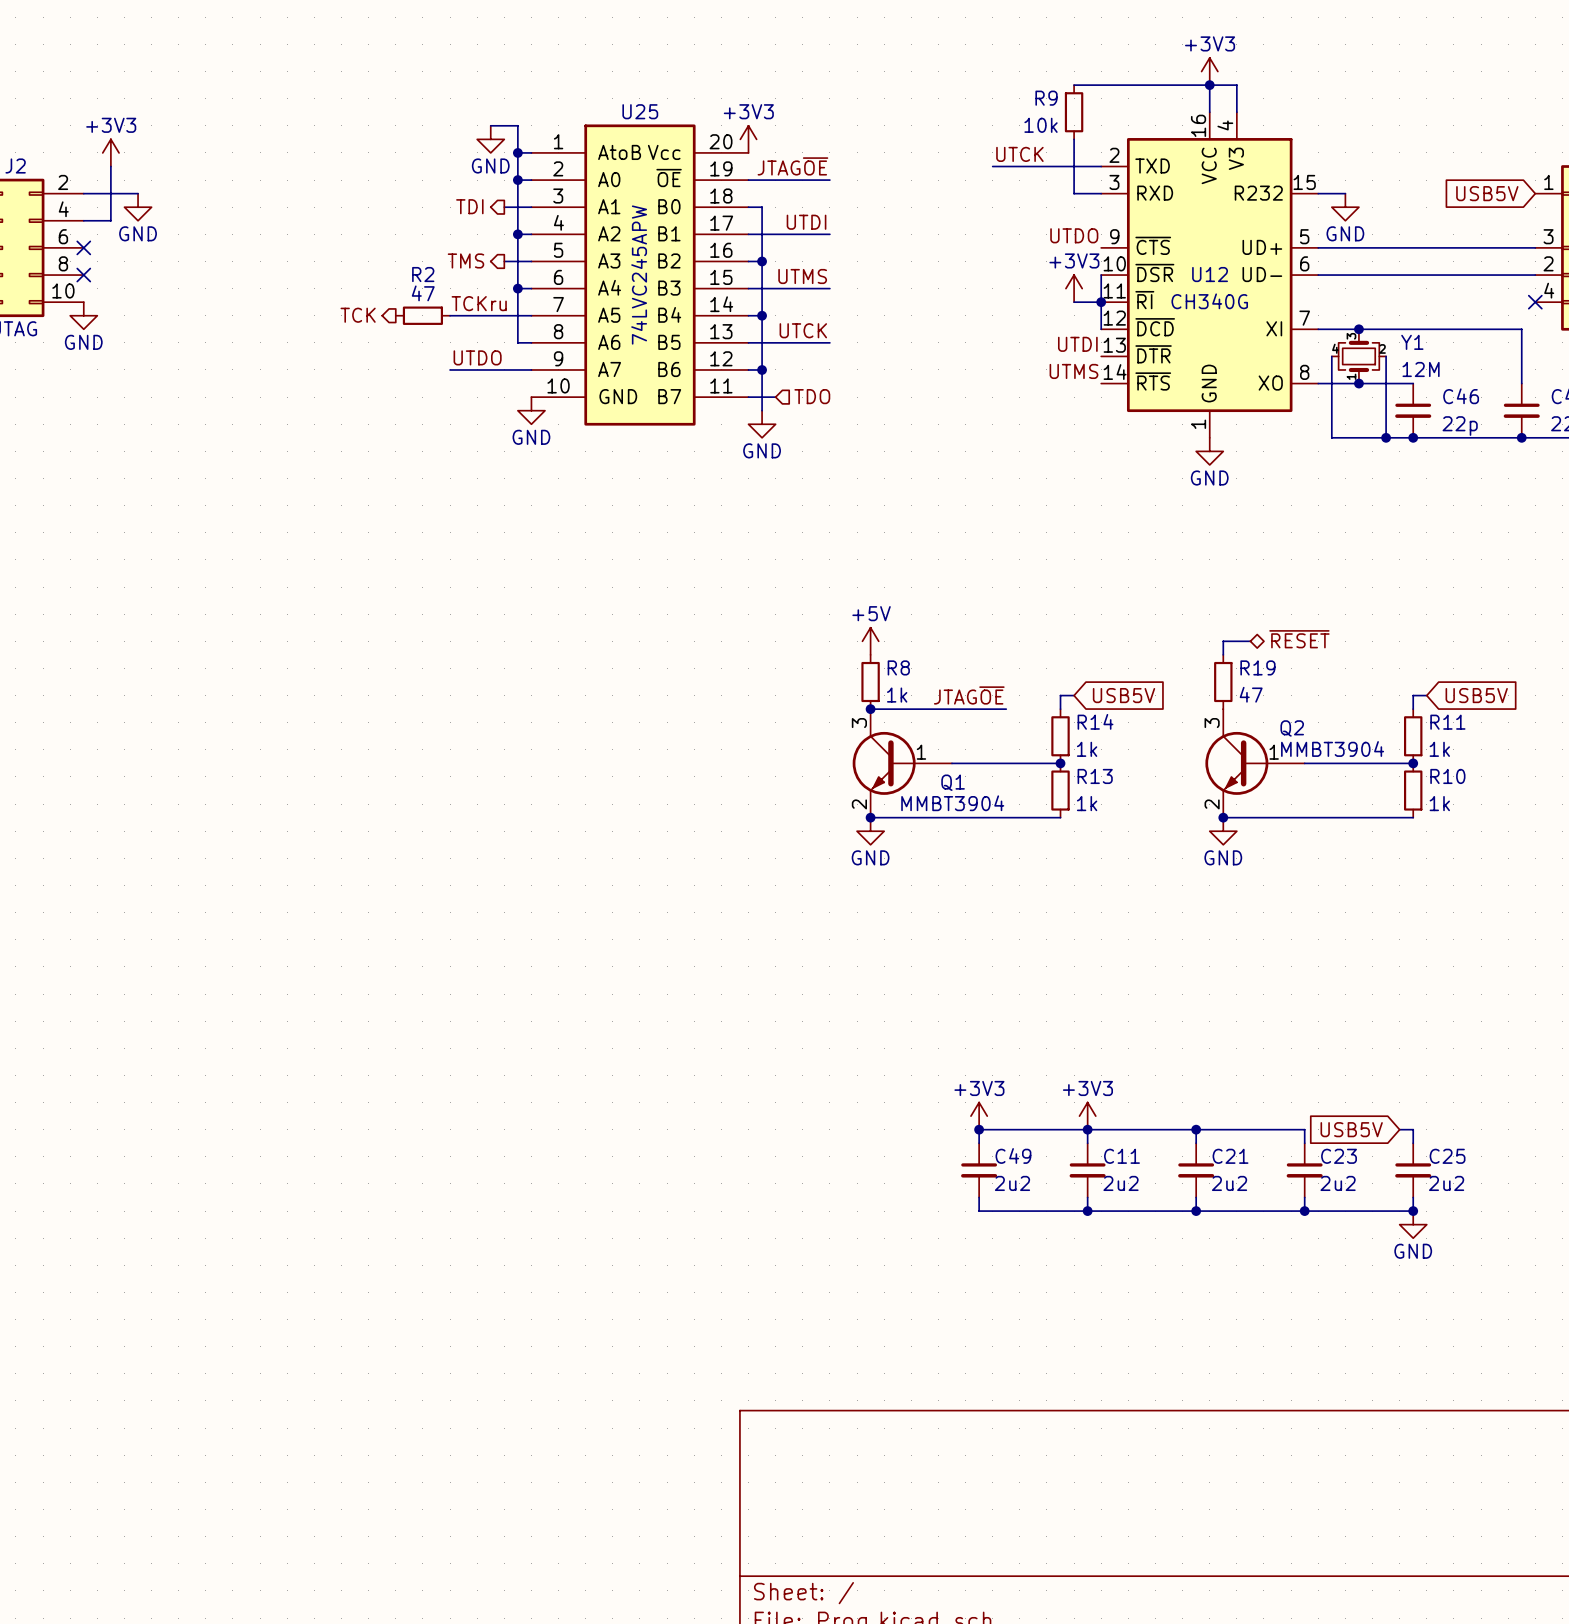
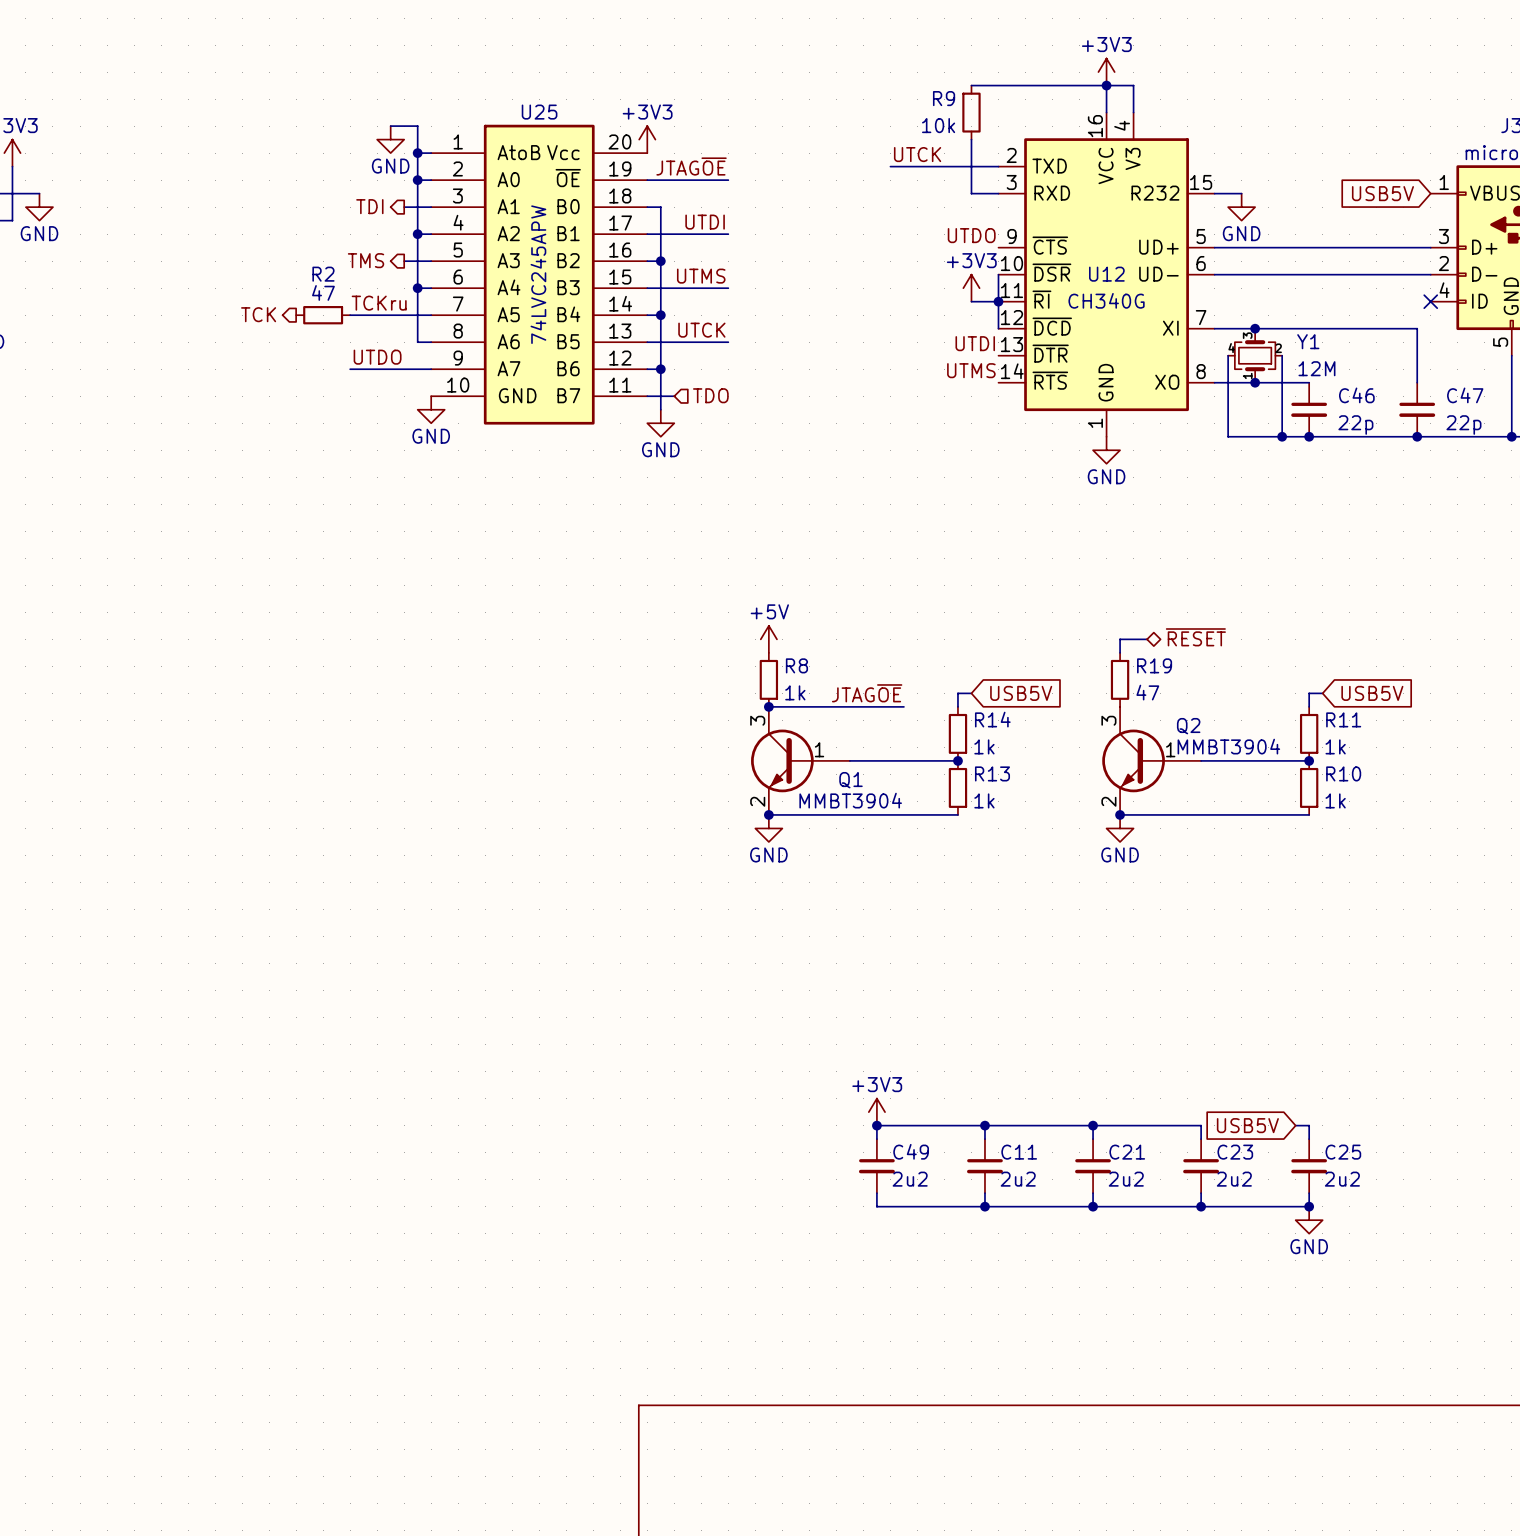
power symbol: +3V3 (1087, 1116) -> none

